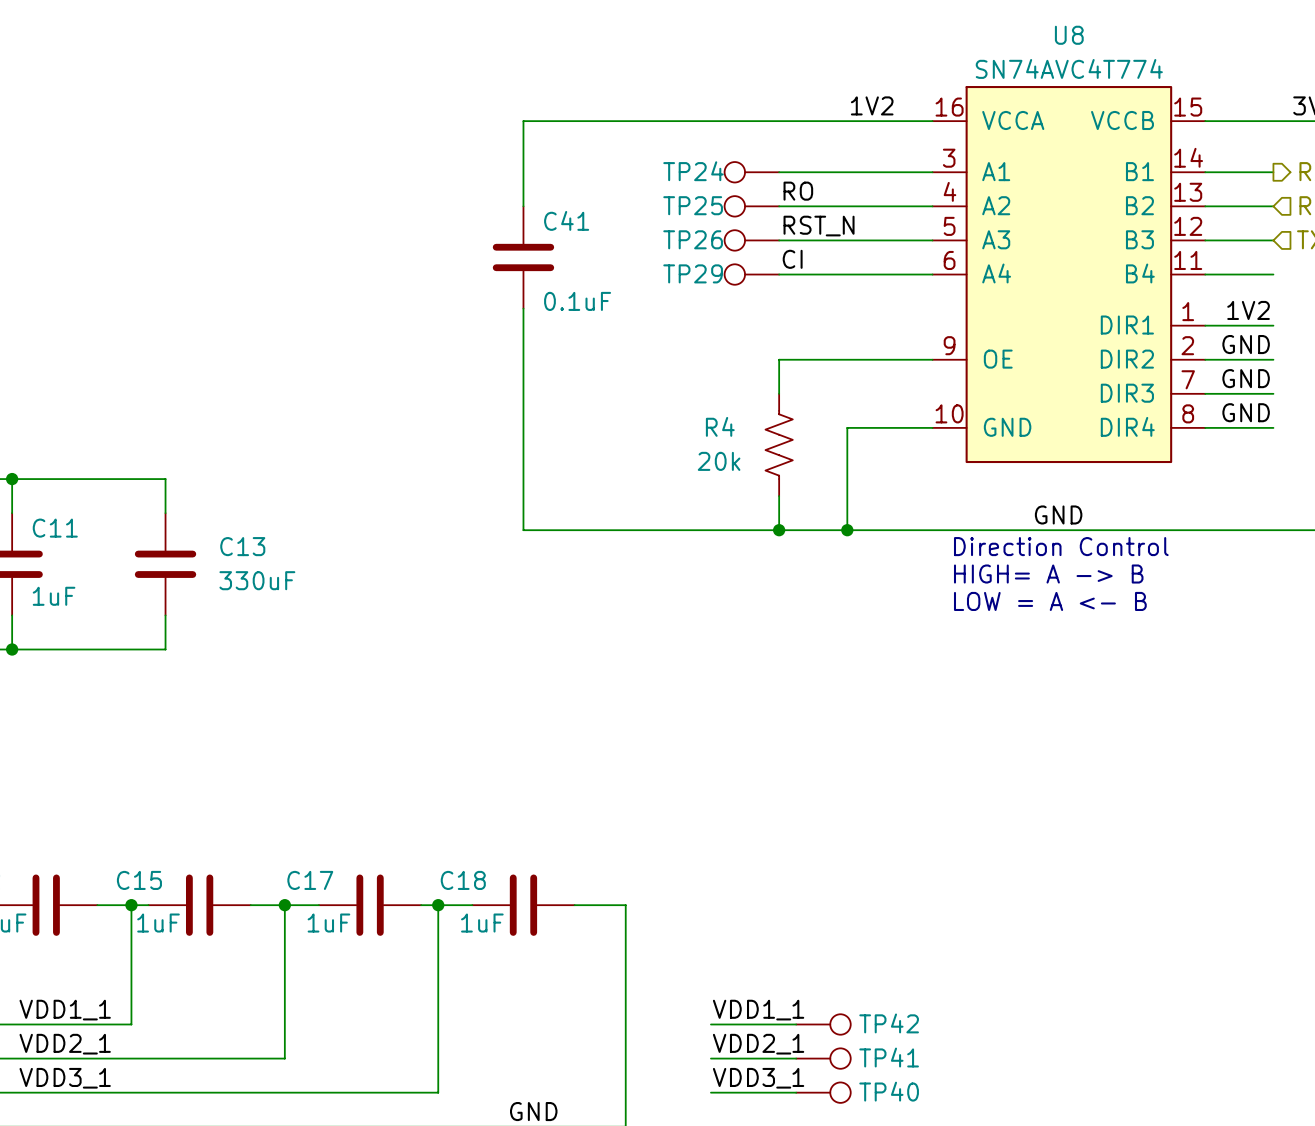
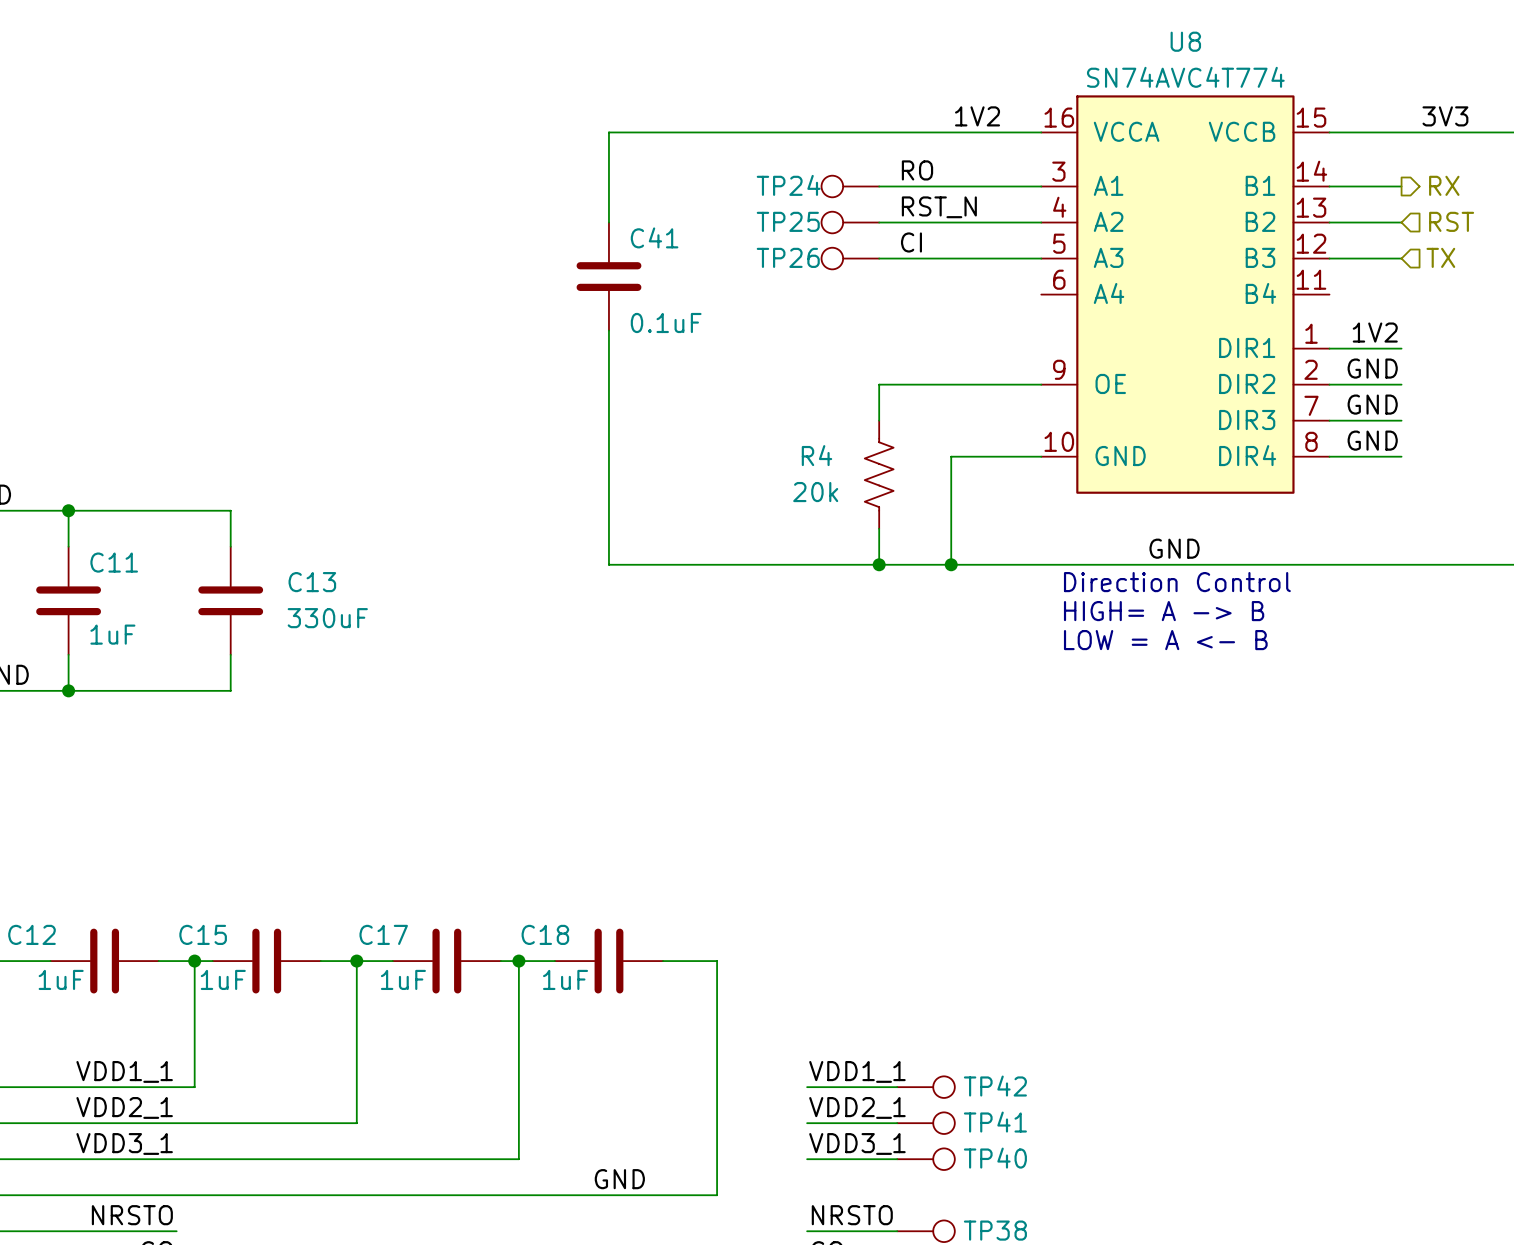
label position: RO (798, 191) -> RO (917, 170)
label position: RST_N (819, 226) -> RST_N (939, 207)
label position: CI (792, 259) -> CI (911, 242)
TP29: (751, 274) -> none
wire: (779, 274) (932, 274) -> none
wire: (1205, 274) (1273, 274) -> none

